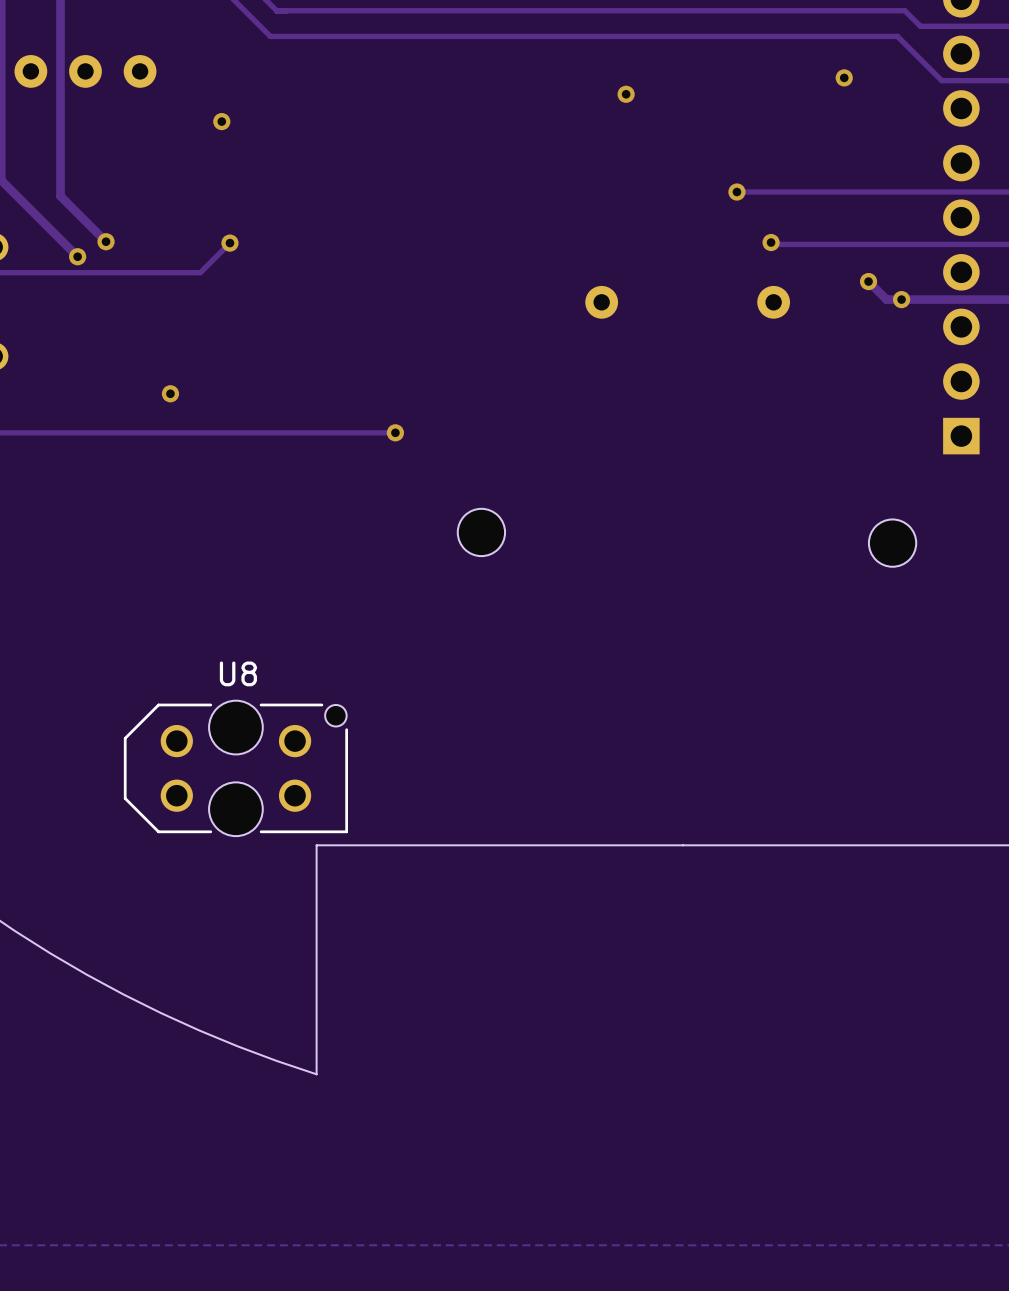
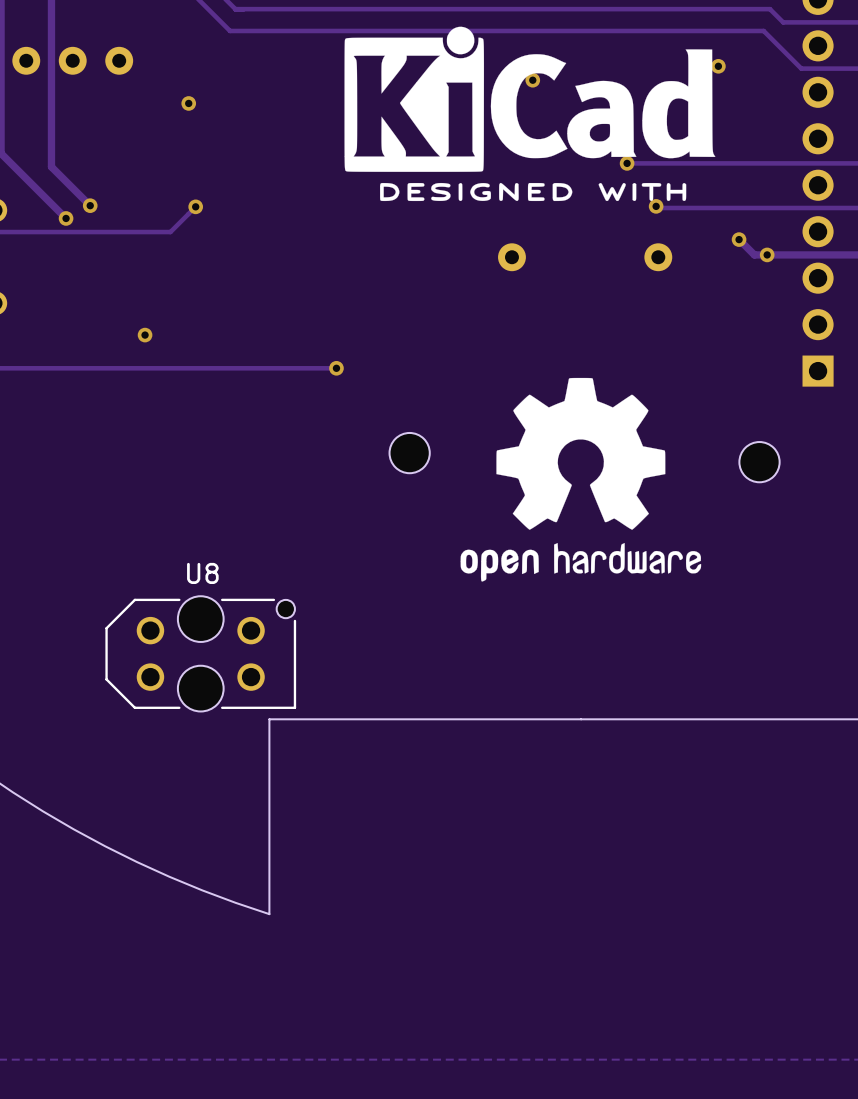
drawing: none -> [344, 26, 716, 202]
drawing: none -> [460, 377, 702, 582]

